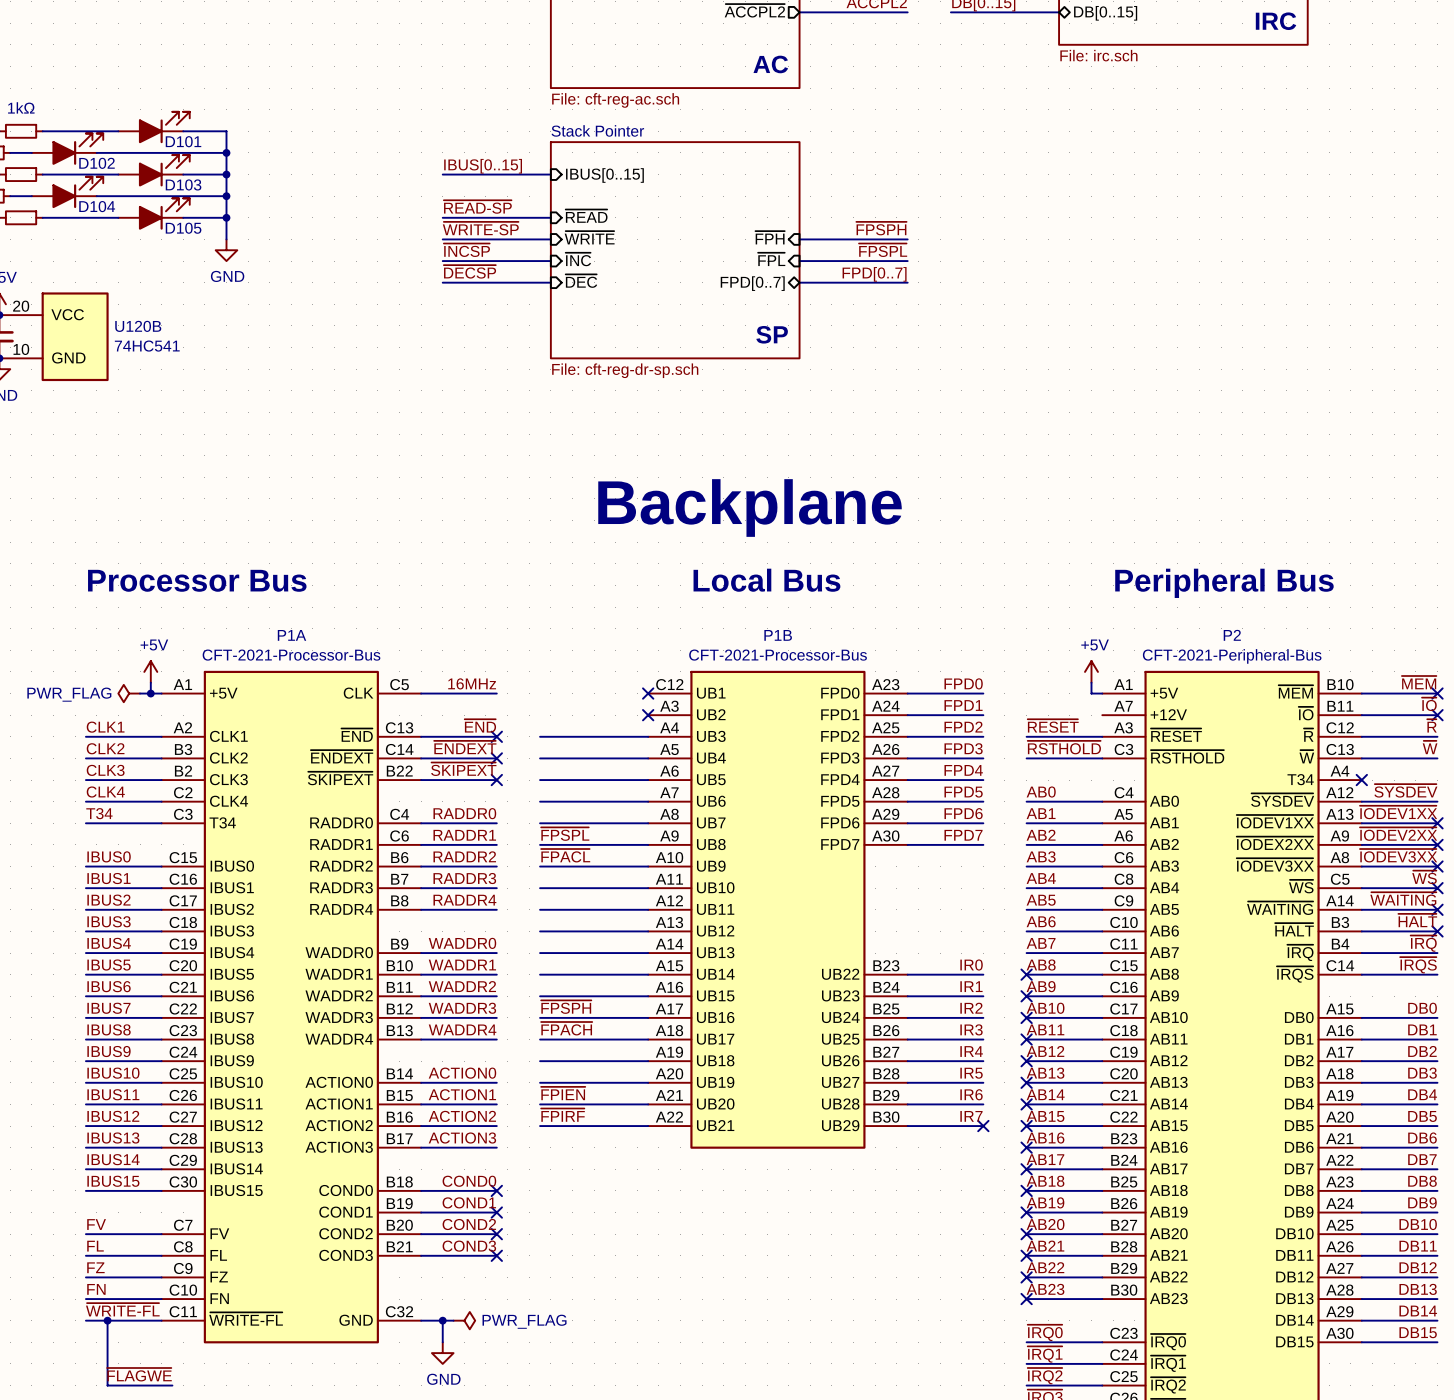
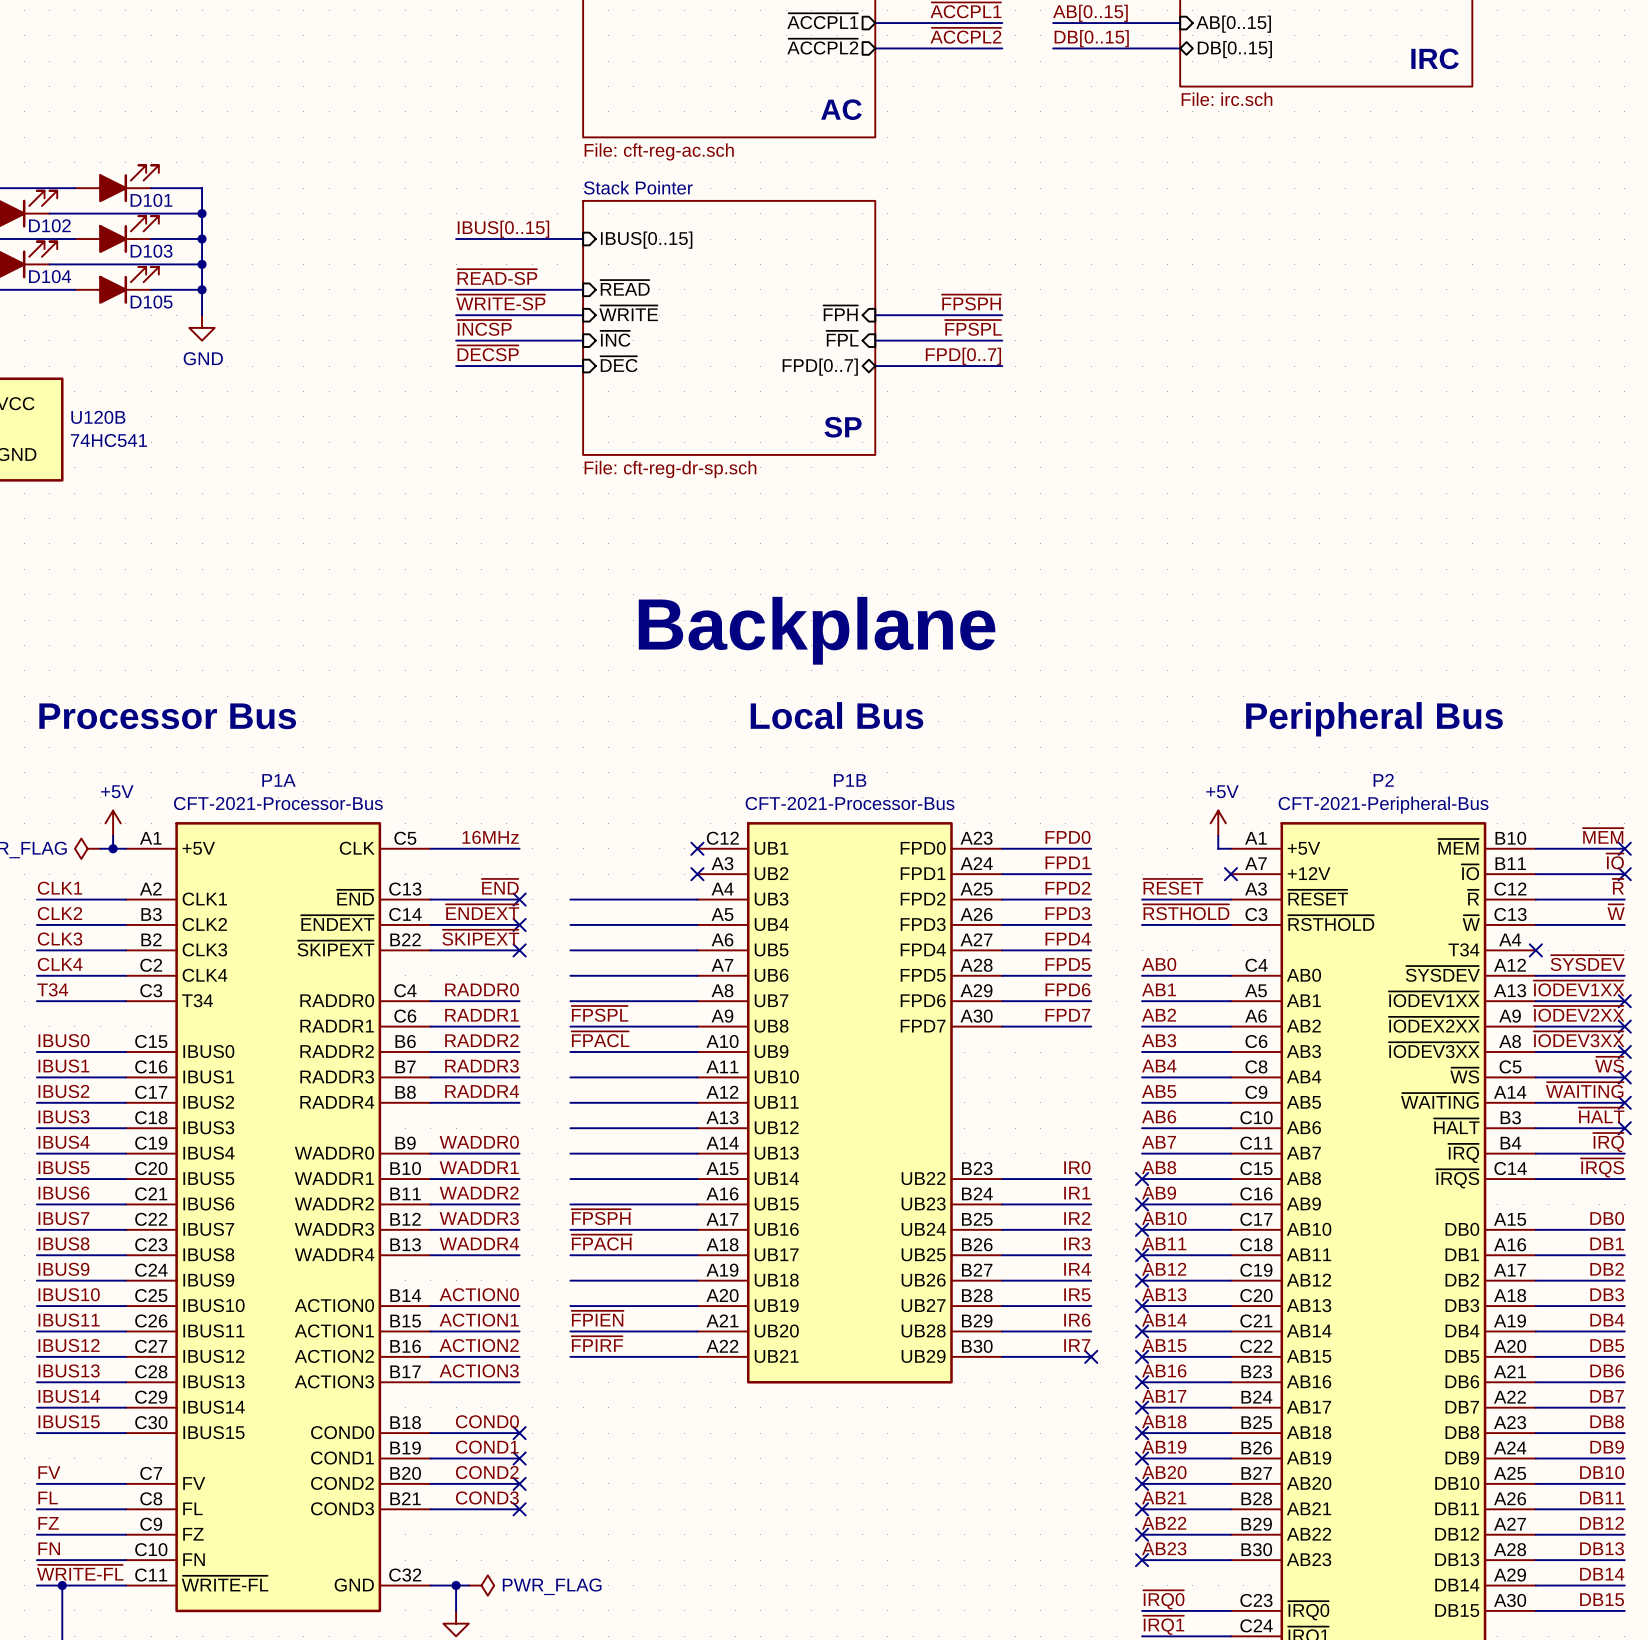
no-connect mark: none -> (1230, 874)

